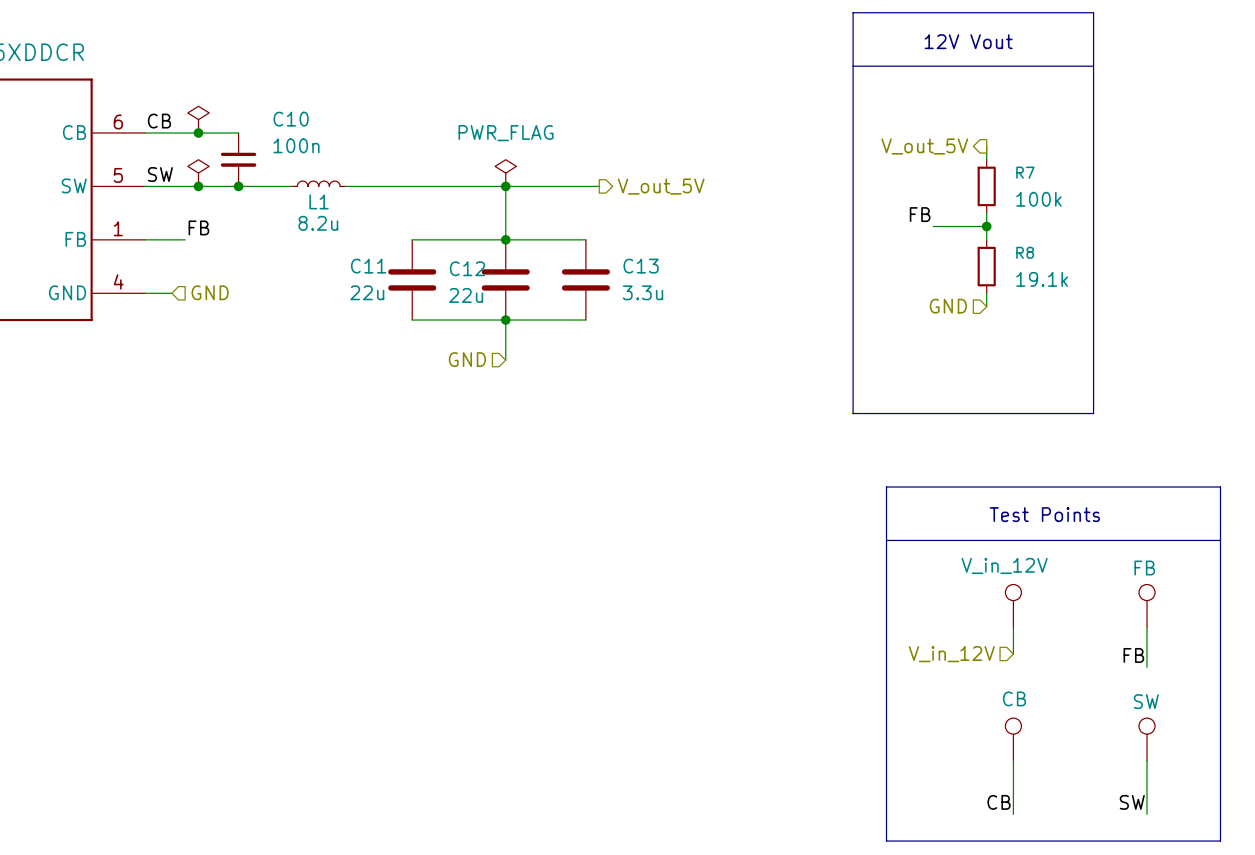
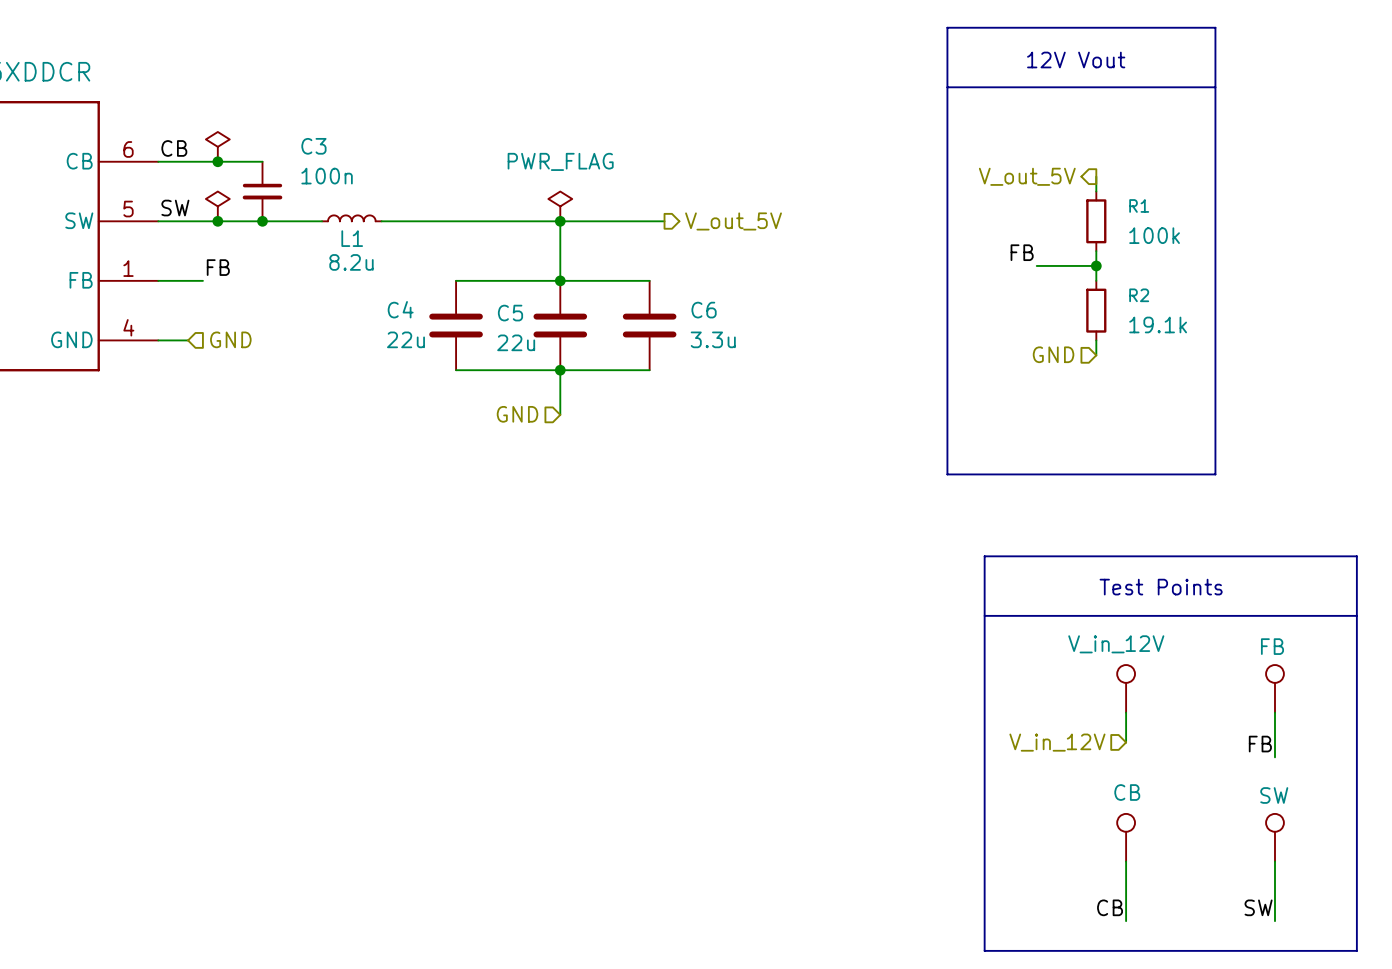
C10 name: C10 (291, 119) -> C3 (313, 146)
R7 name: R7 (1025, 172) -> R1 (1139, 205)
R8 name: R8 (1025, 252) -> R2 (1139, 295)
C11 name: C11 (368, 266) -> C4 (400, 309)
C13 name: C13 (641, 266) -> C6 (704, 310)
C12 name: C12 (467, 268) -> C5 (510, 313)

